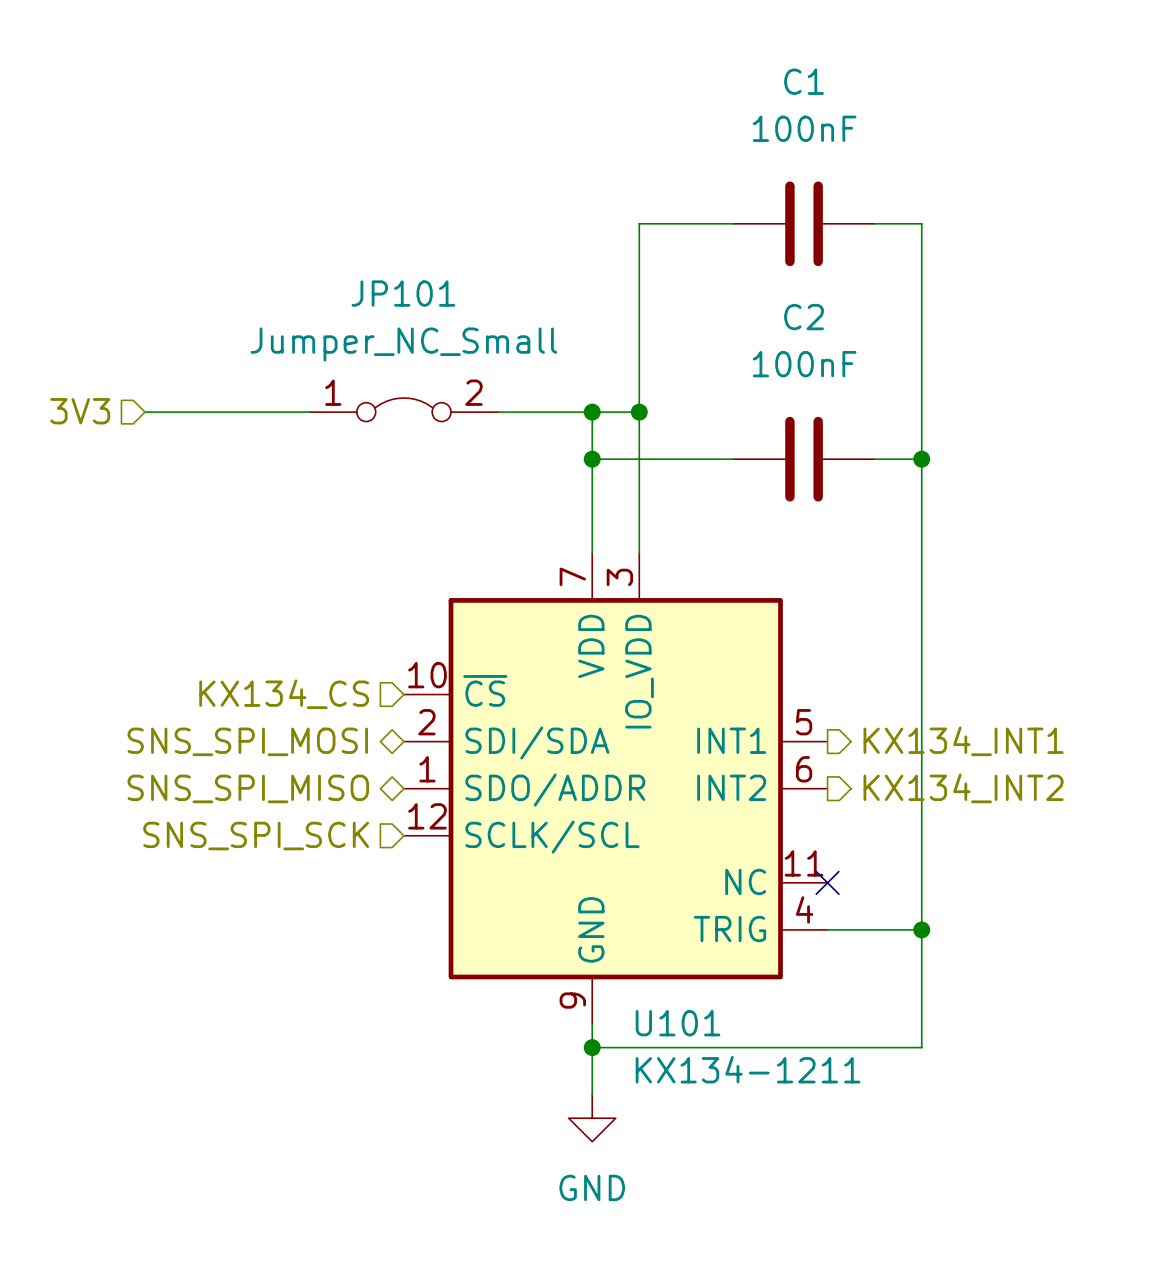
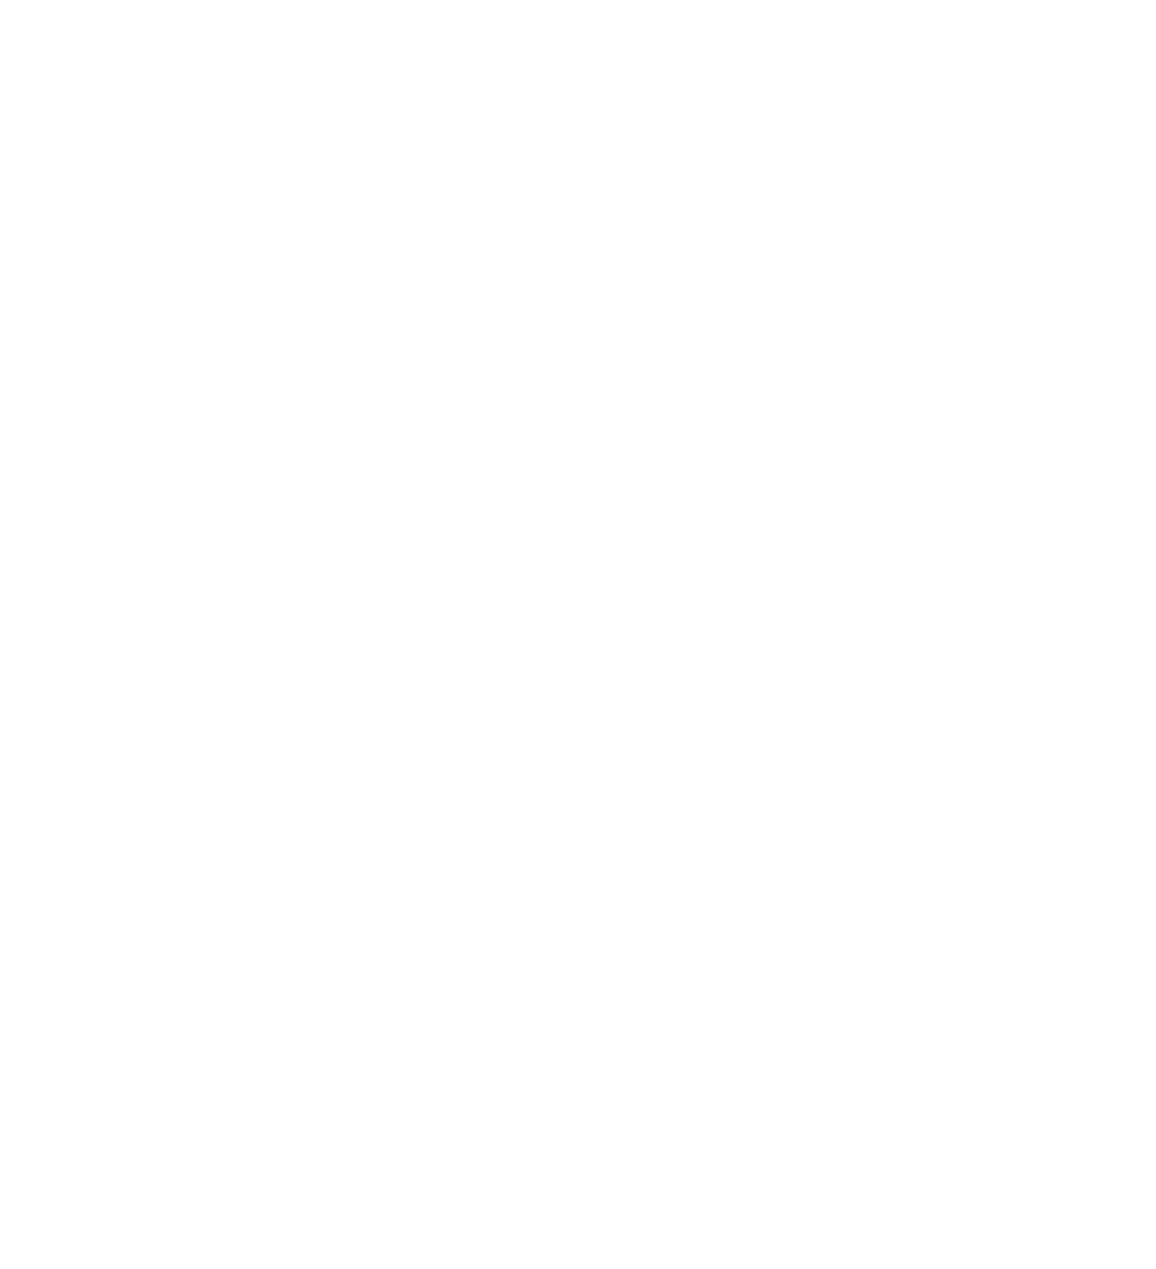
wire: (733, 223) (639, 223) (639, 553) -> none
C1: 100nF (804, 223) -> none
wire: (874, 223) (921, 223) (921, 1047) (592, 1047) -> none
JP101: Jumper_NC_Small (403, 409) -> none
hierarchical label: 3V3 (80, 411) -> none
wire: (145, 412) (309, 412) -> none
wire: (498, 412) (639, 412) -> none
wire: (592, 412) (592, 553) -> none
junction: (592, 412) -> none
junction: (639, 412) -> none
wire: (592, 459) (733, 459) -> none
junction: (592, 459) -> none
C2: 100nF (804, 459) -> none
wire: (874, 459) (921, 459) -> none
junction: (921, 459) -> none
hierarchical label: KX134_CS (284, 694) -> none
hierarchical label: SNS_SPI_MOSI (247, 741) -> none
hierarchical label: KX134_INT1 (963, 741) -> none
hierarchical label: SNS_SPI_MISO (248, 788) -> none
U101: KX134-1211 (615, 788) -> none
hierarchical label: KX134_INT2 (963, 788) -> none
hierarchical label: SNS_SPI_SCK (256, 836) -> none
no-connect mark: (827, 882) -> none
wire: (827, 929) (921, 929) -> none
junction: (921, 929) -> none
wire: (592, 1024) (592, 1094) -> none
junction: (592, 1047) -> none
power symbol: GND (592, 1118) -> none

